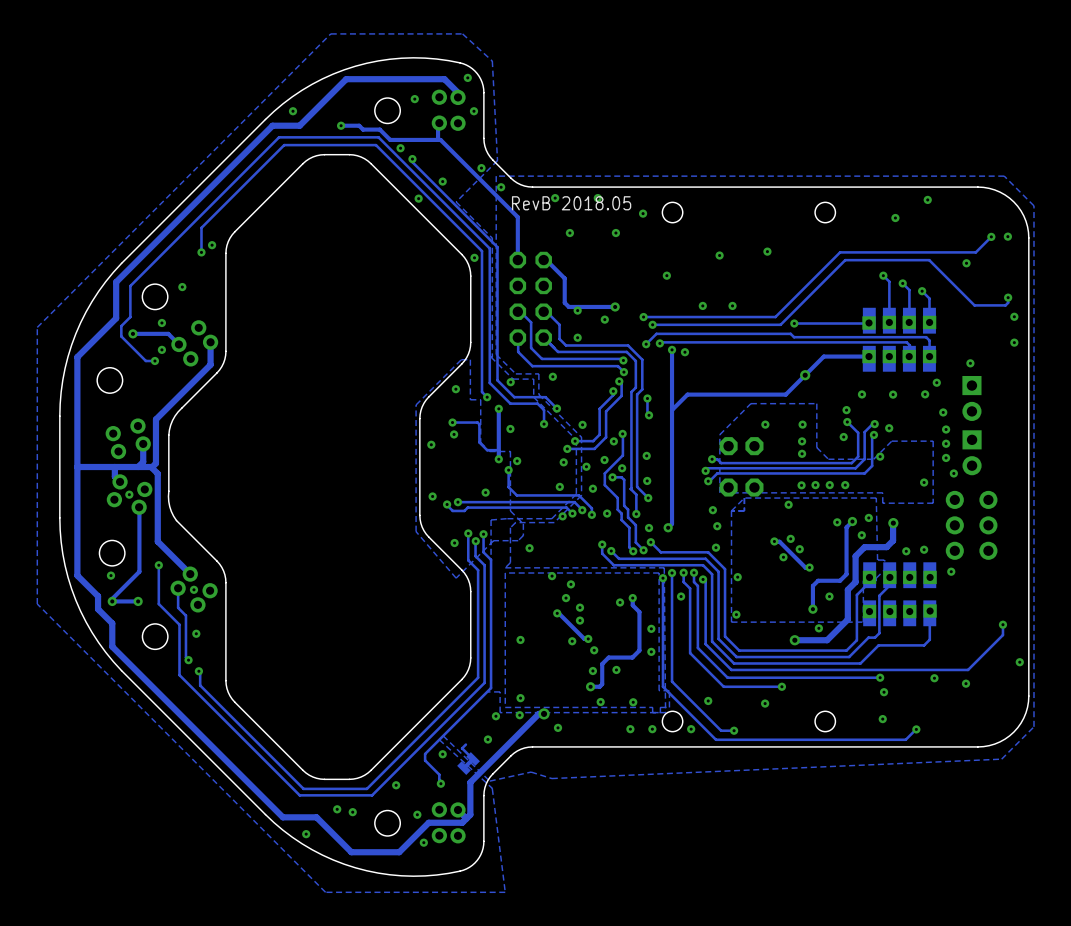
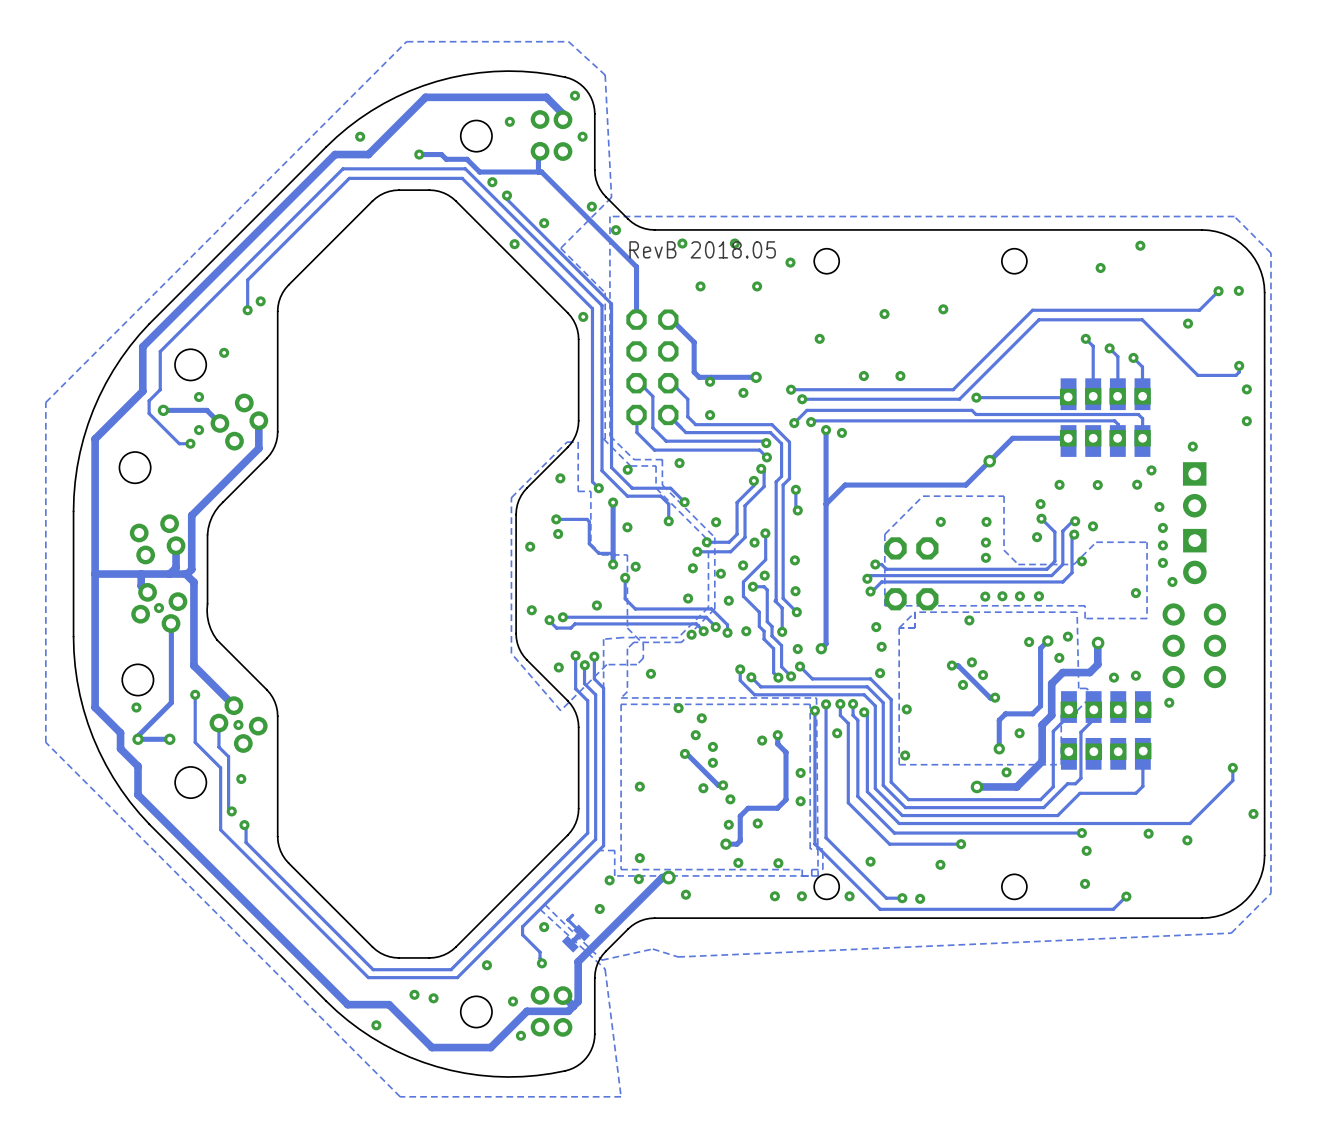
via: none -> (920, 898)

